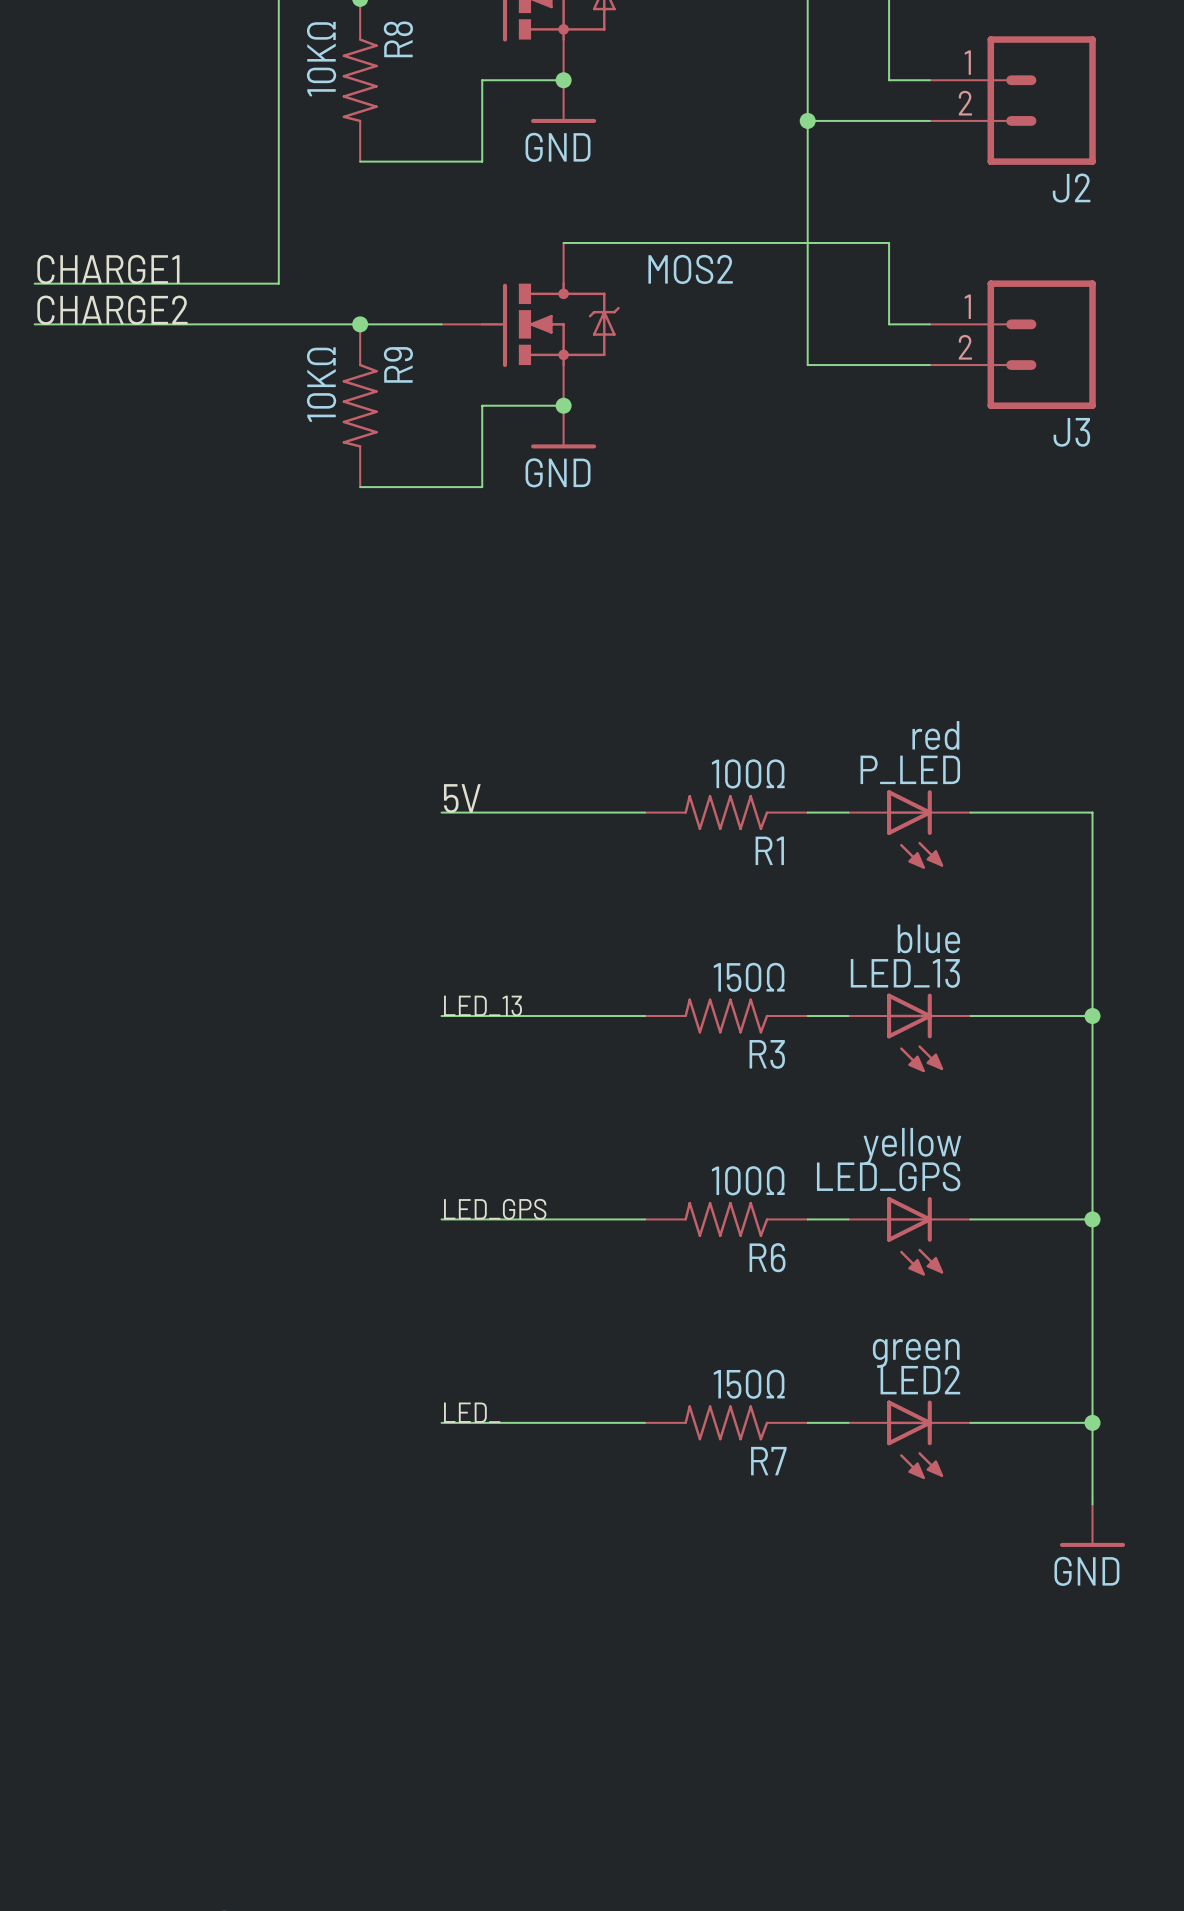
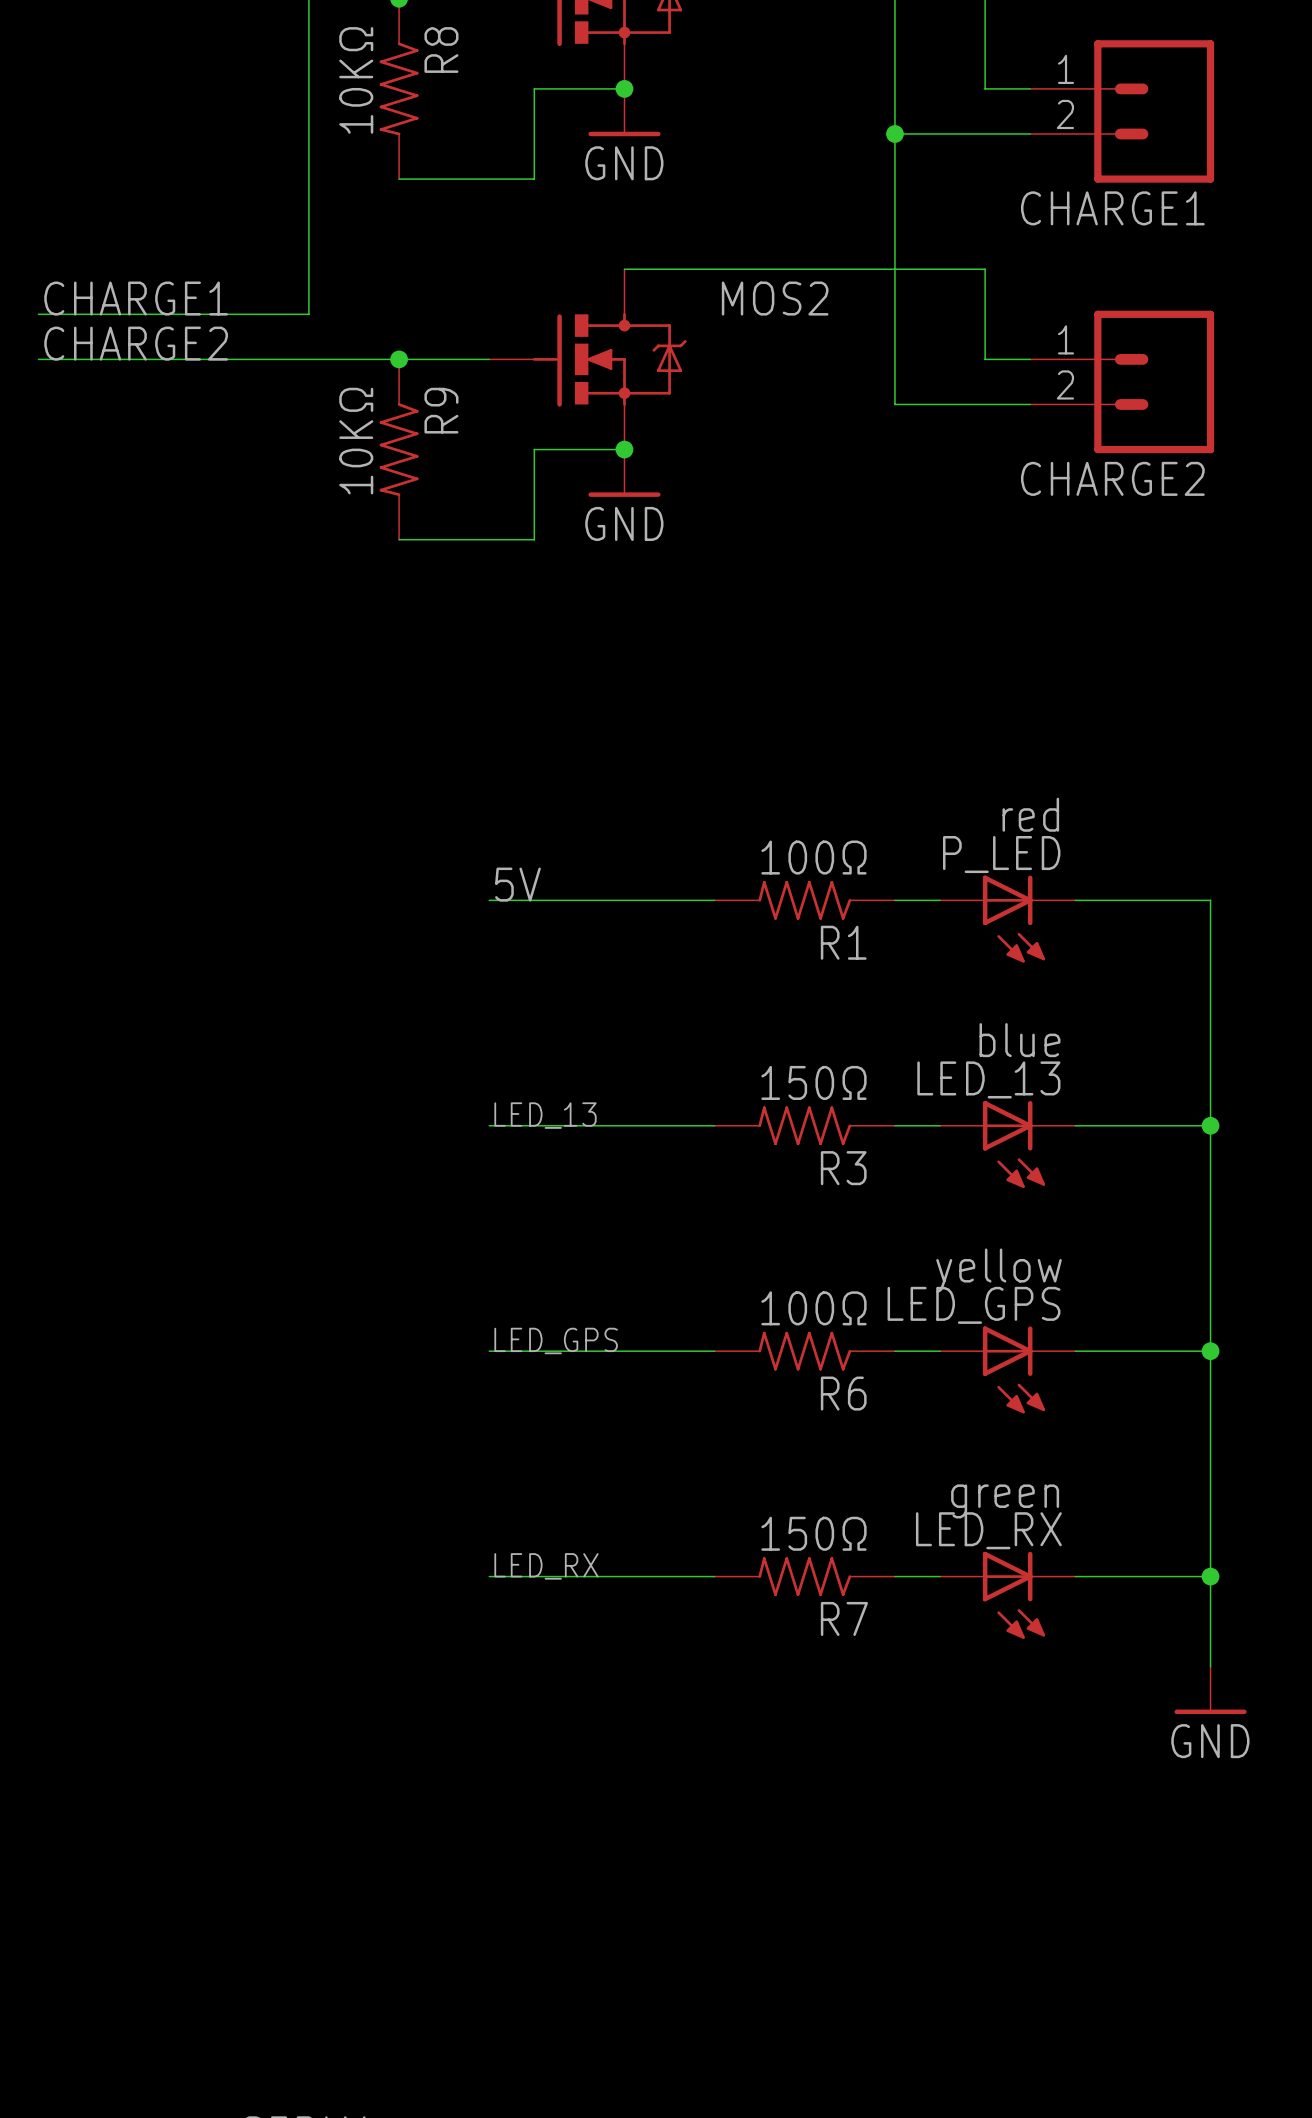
J2 name: J2 (1071, 188) -> CHARGE1 (1112, 208)
J3 name: J3 (1071, 432) -> CHARGE2 (1112, 478)
LED2 name: LED2 (920, 1379) -> LED_RX (988, 1530)
label: LED_ (472, 1412) -> LED_RX (546, 1566)

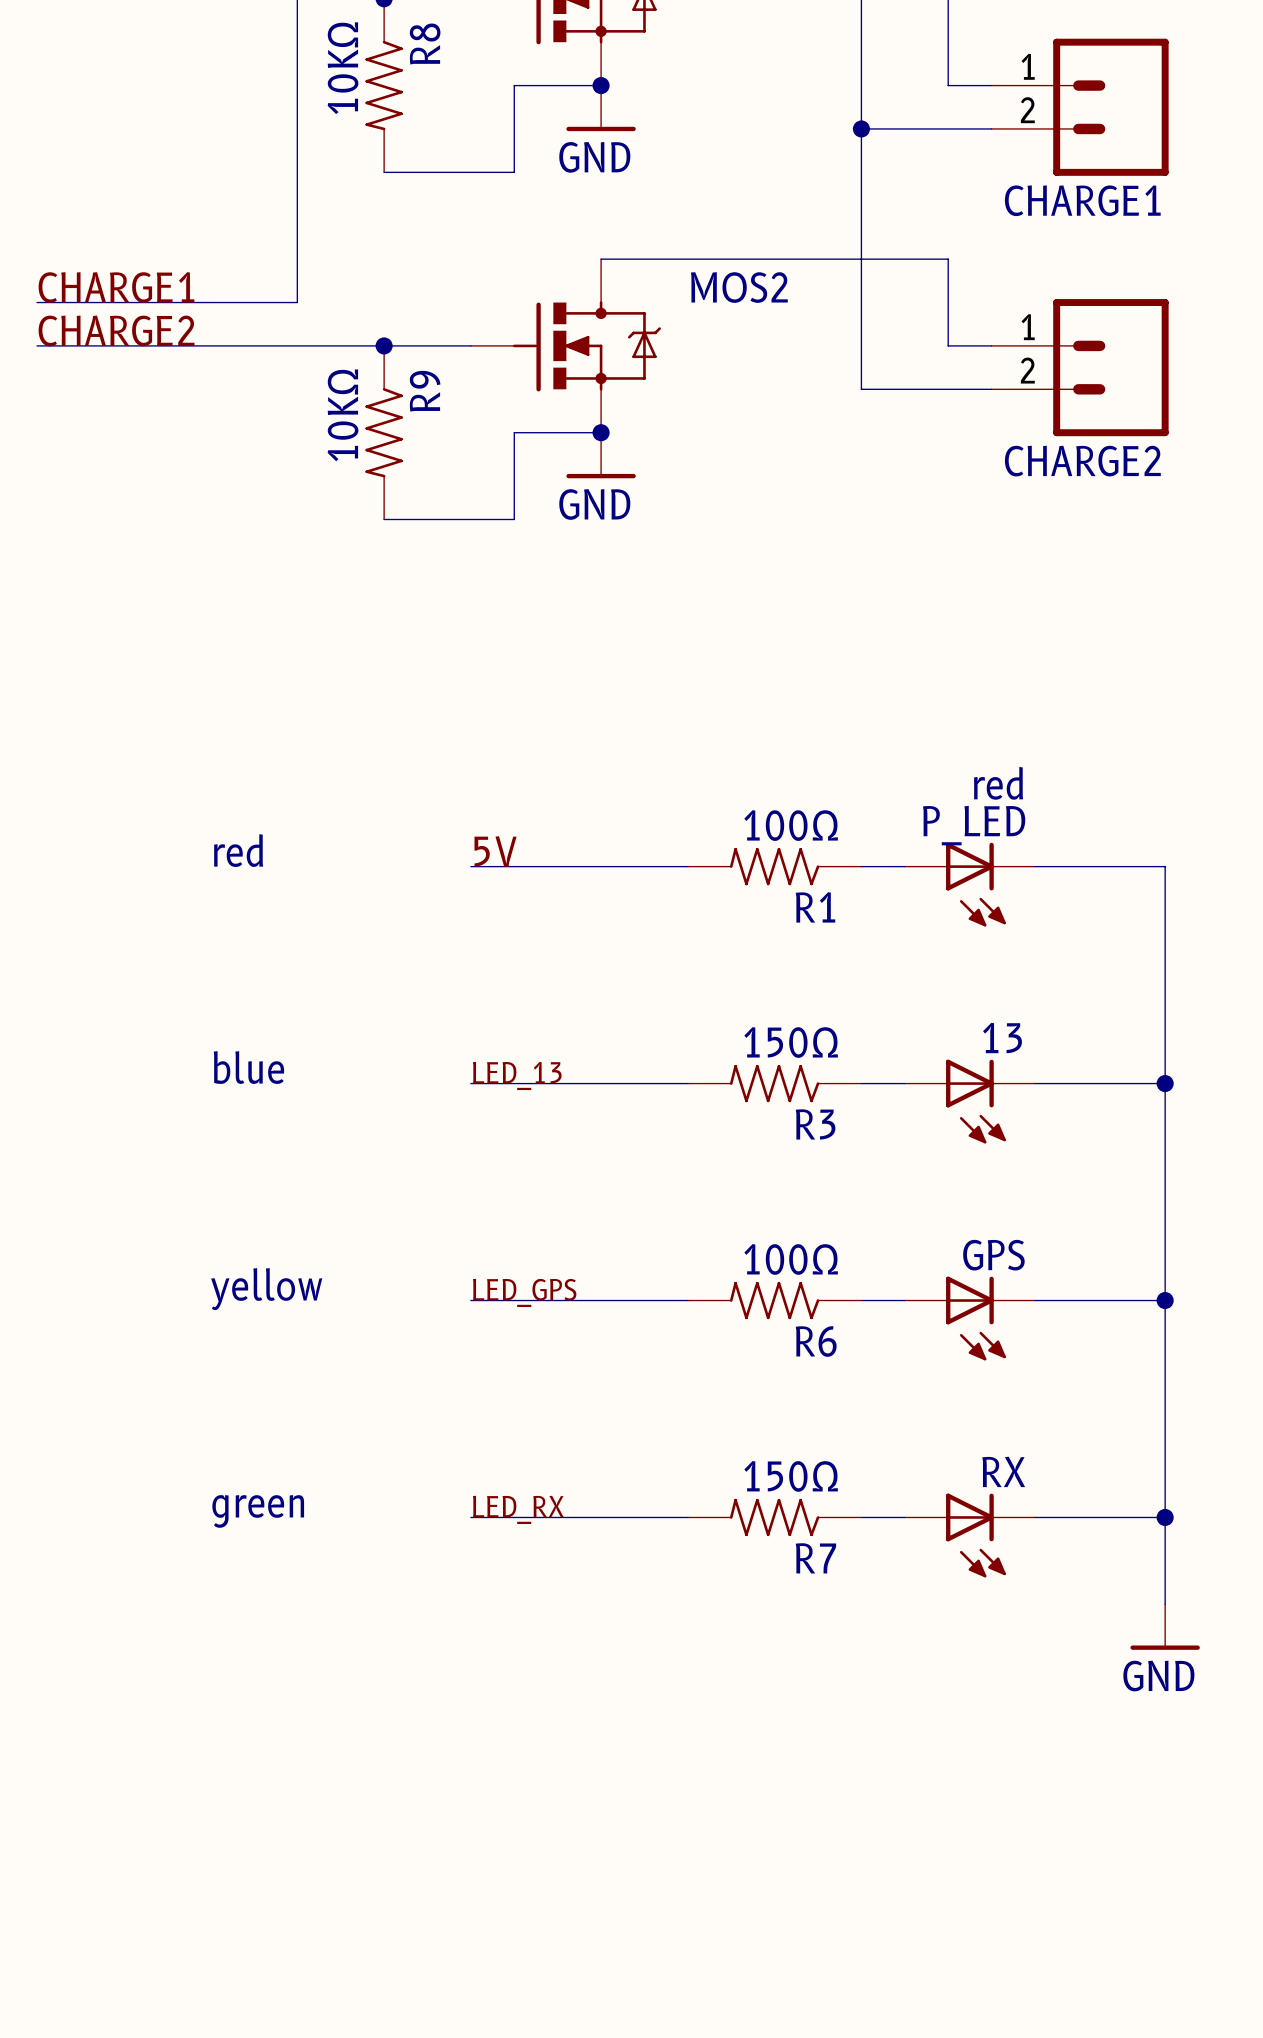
text: none -> red (238, 850)
LED_13 value: blue (1019, 1040) -> none
LED_13 name: LED_13 (988, 1079) -> 13 (1002, 1038)
text: none -> blue (248, 1067)
LED_GPS value: yellow (999, 1270) -> none
LED_GPS name: LED_GPS (974, 1305) -> GPS (993, 1255)
text: none -> yellow (266, 1289)
LED_RX value: green (1005, 1501) -> none
LED_RX name: LED_RX (988, 1530) -> RX (1003, 1471)
text: none -> green (258, 1511)

